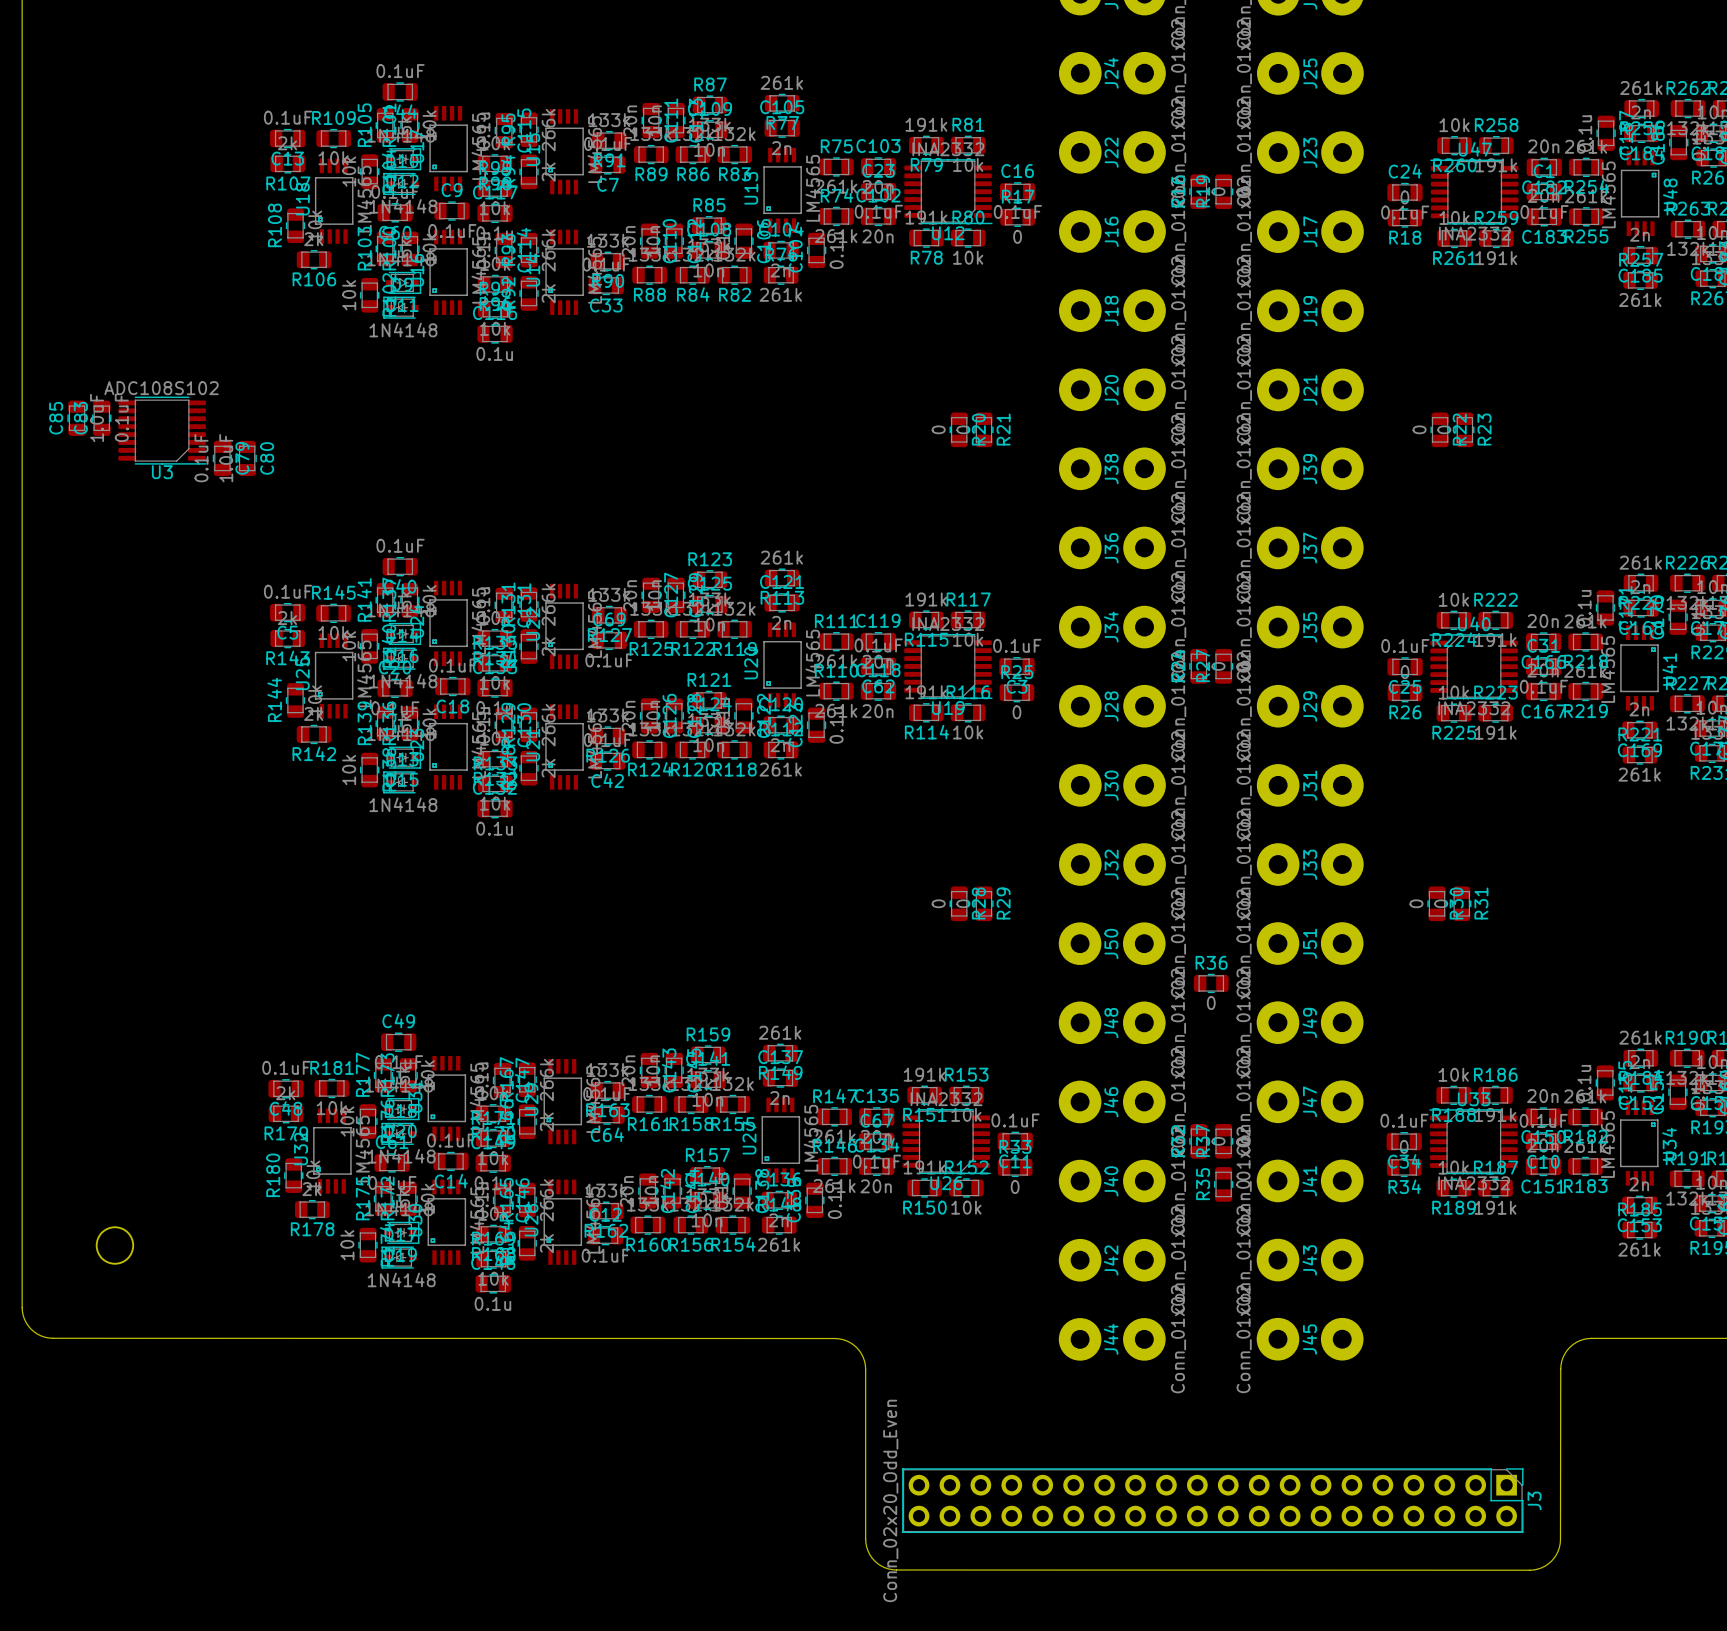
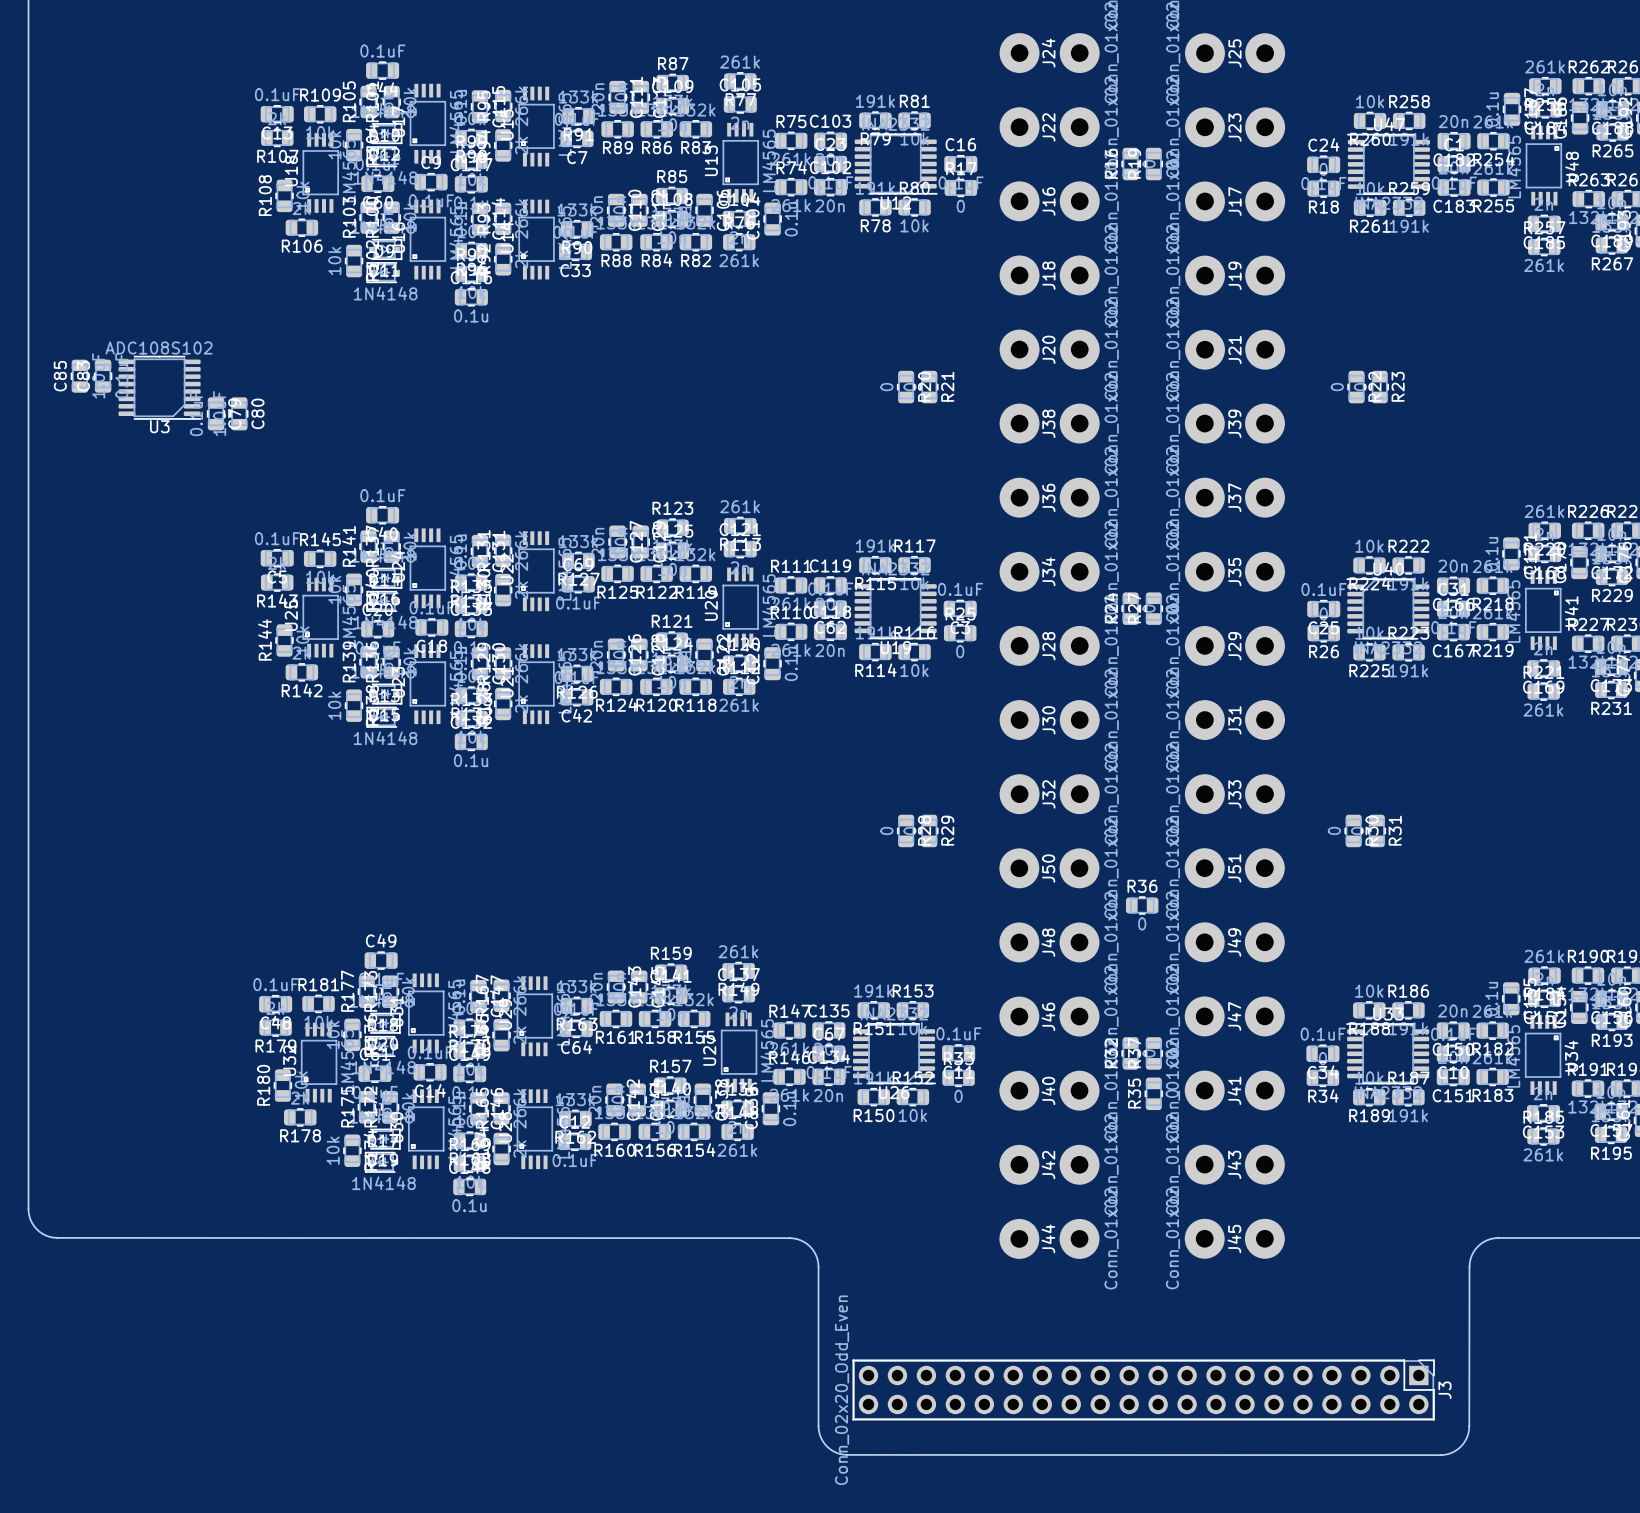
round board edge: [95, 1226, 135, 1265] -> none

